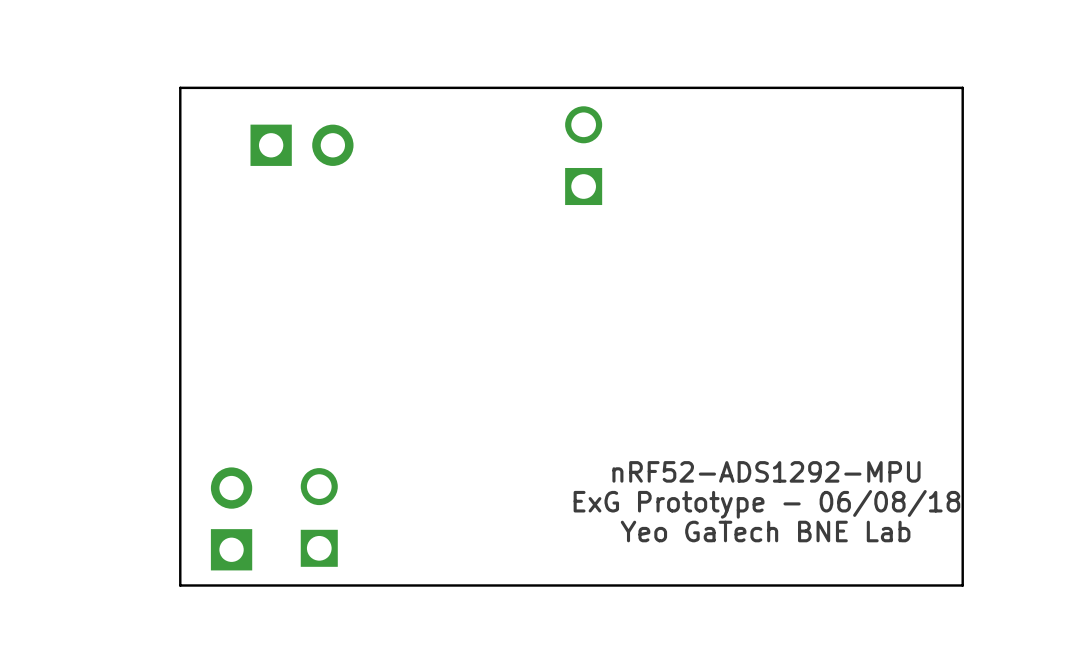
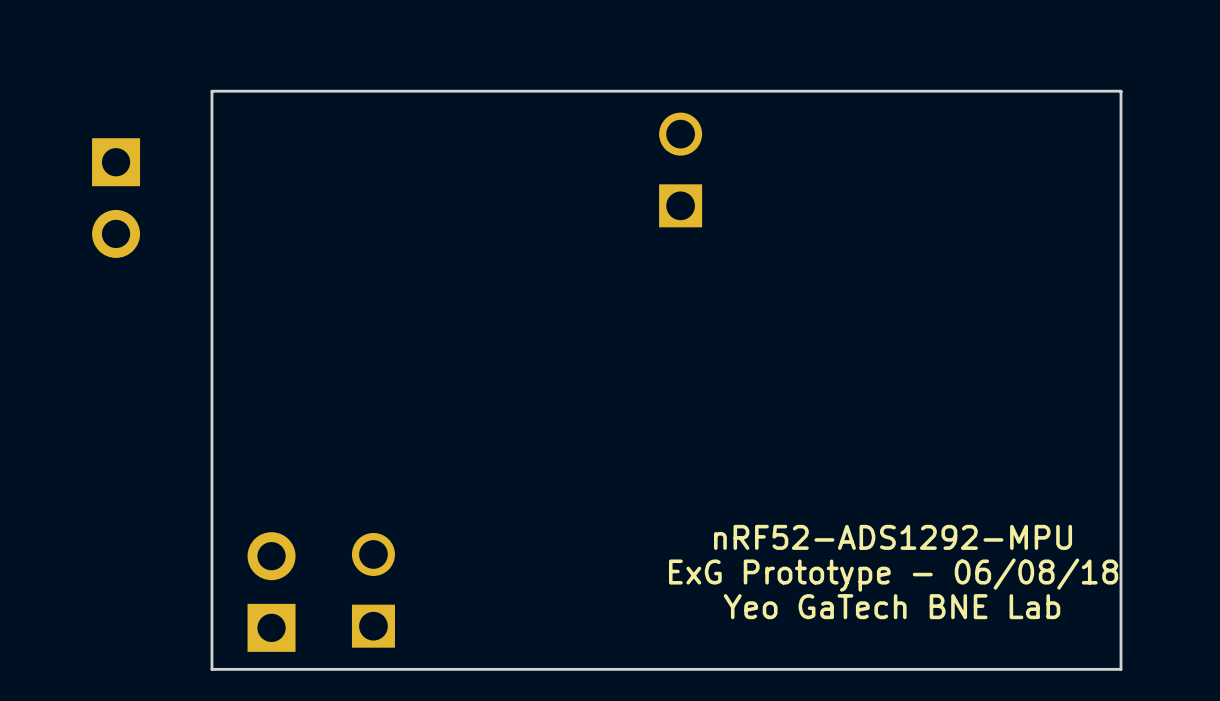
part rotation: 0° (302, 145) -> 90° clockwise (116, 198)
part position: (302, 145) -> (116, 198)

